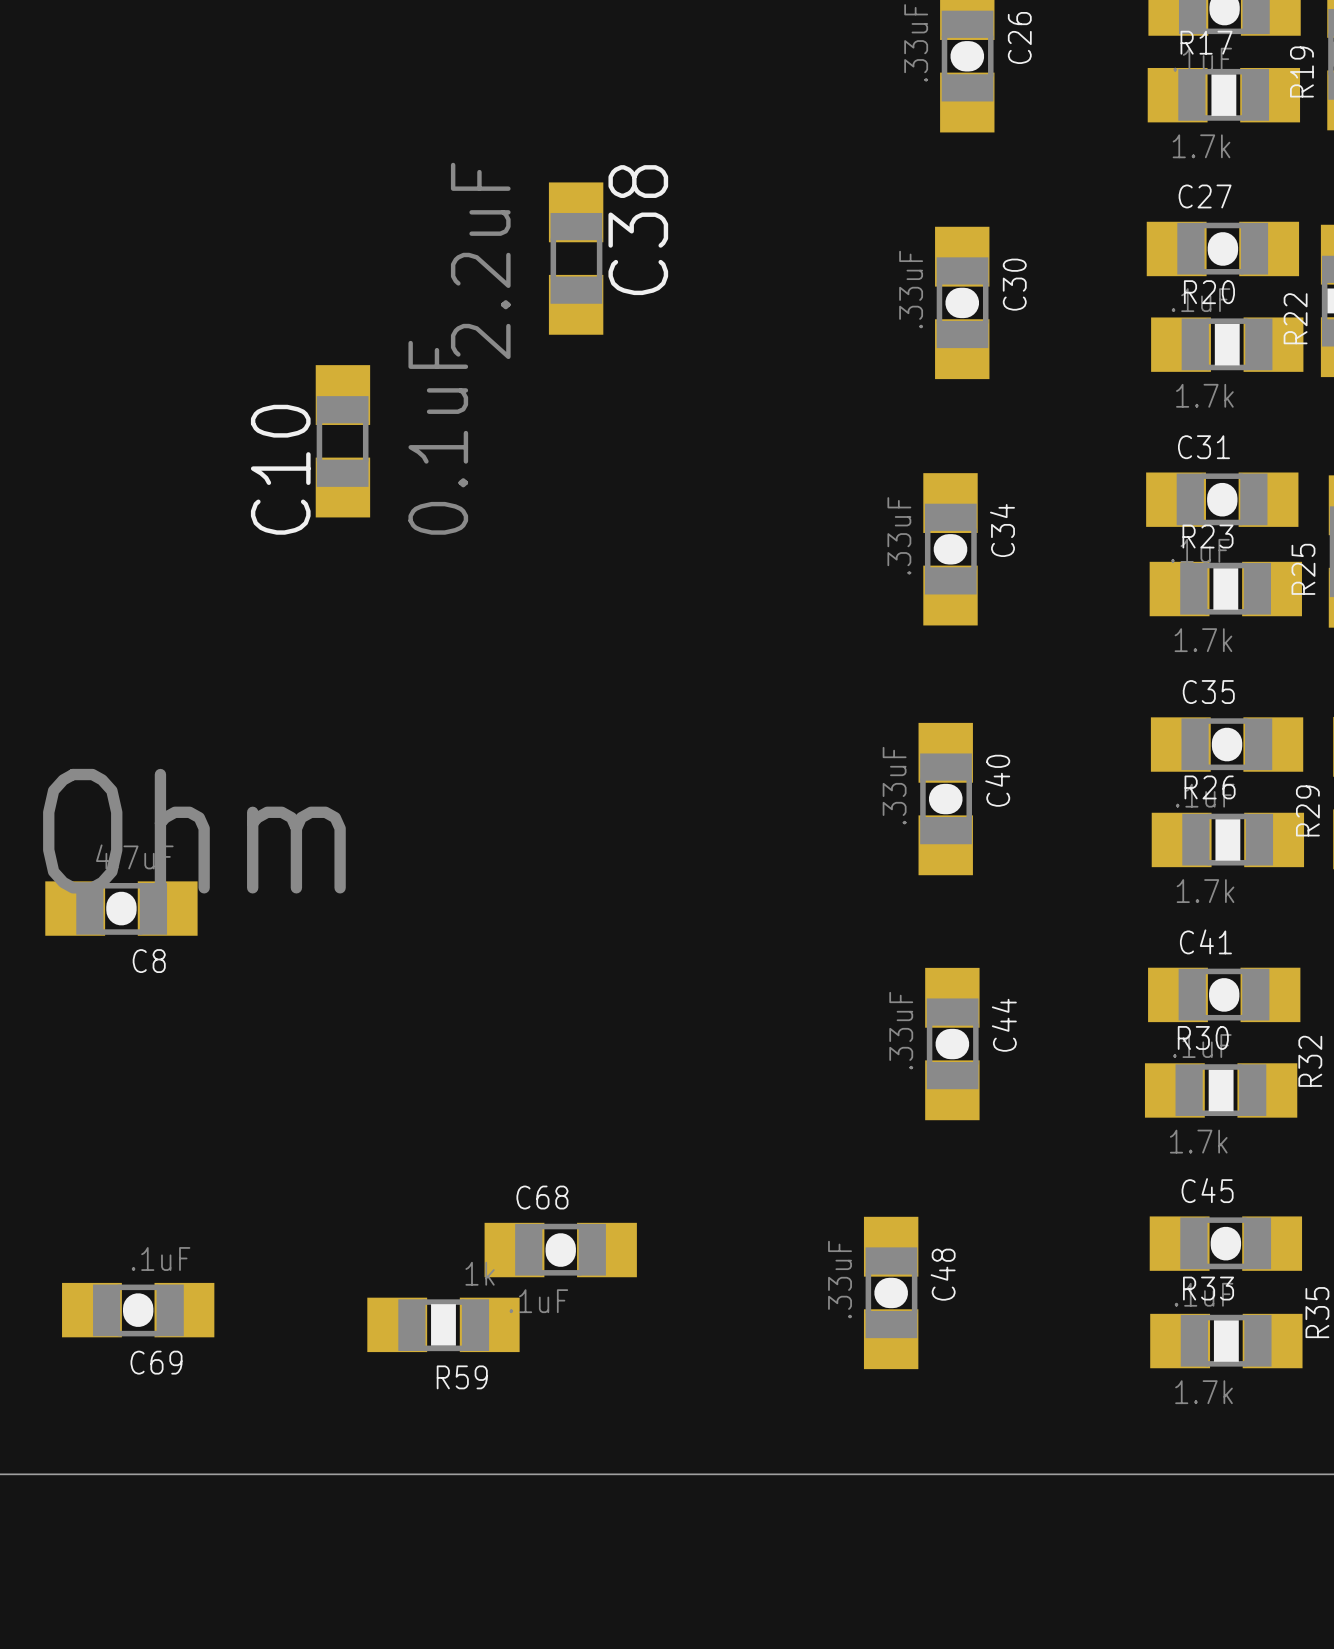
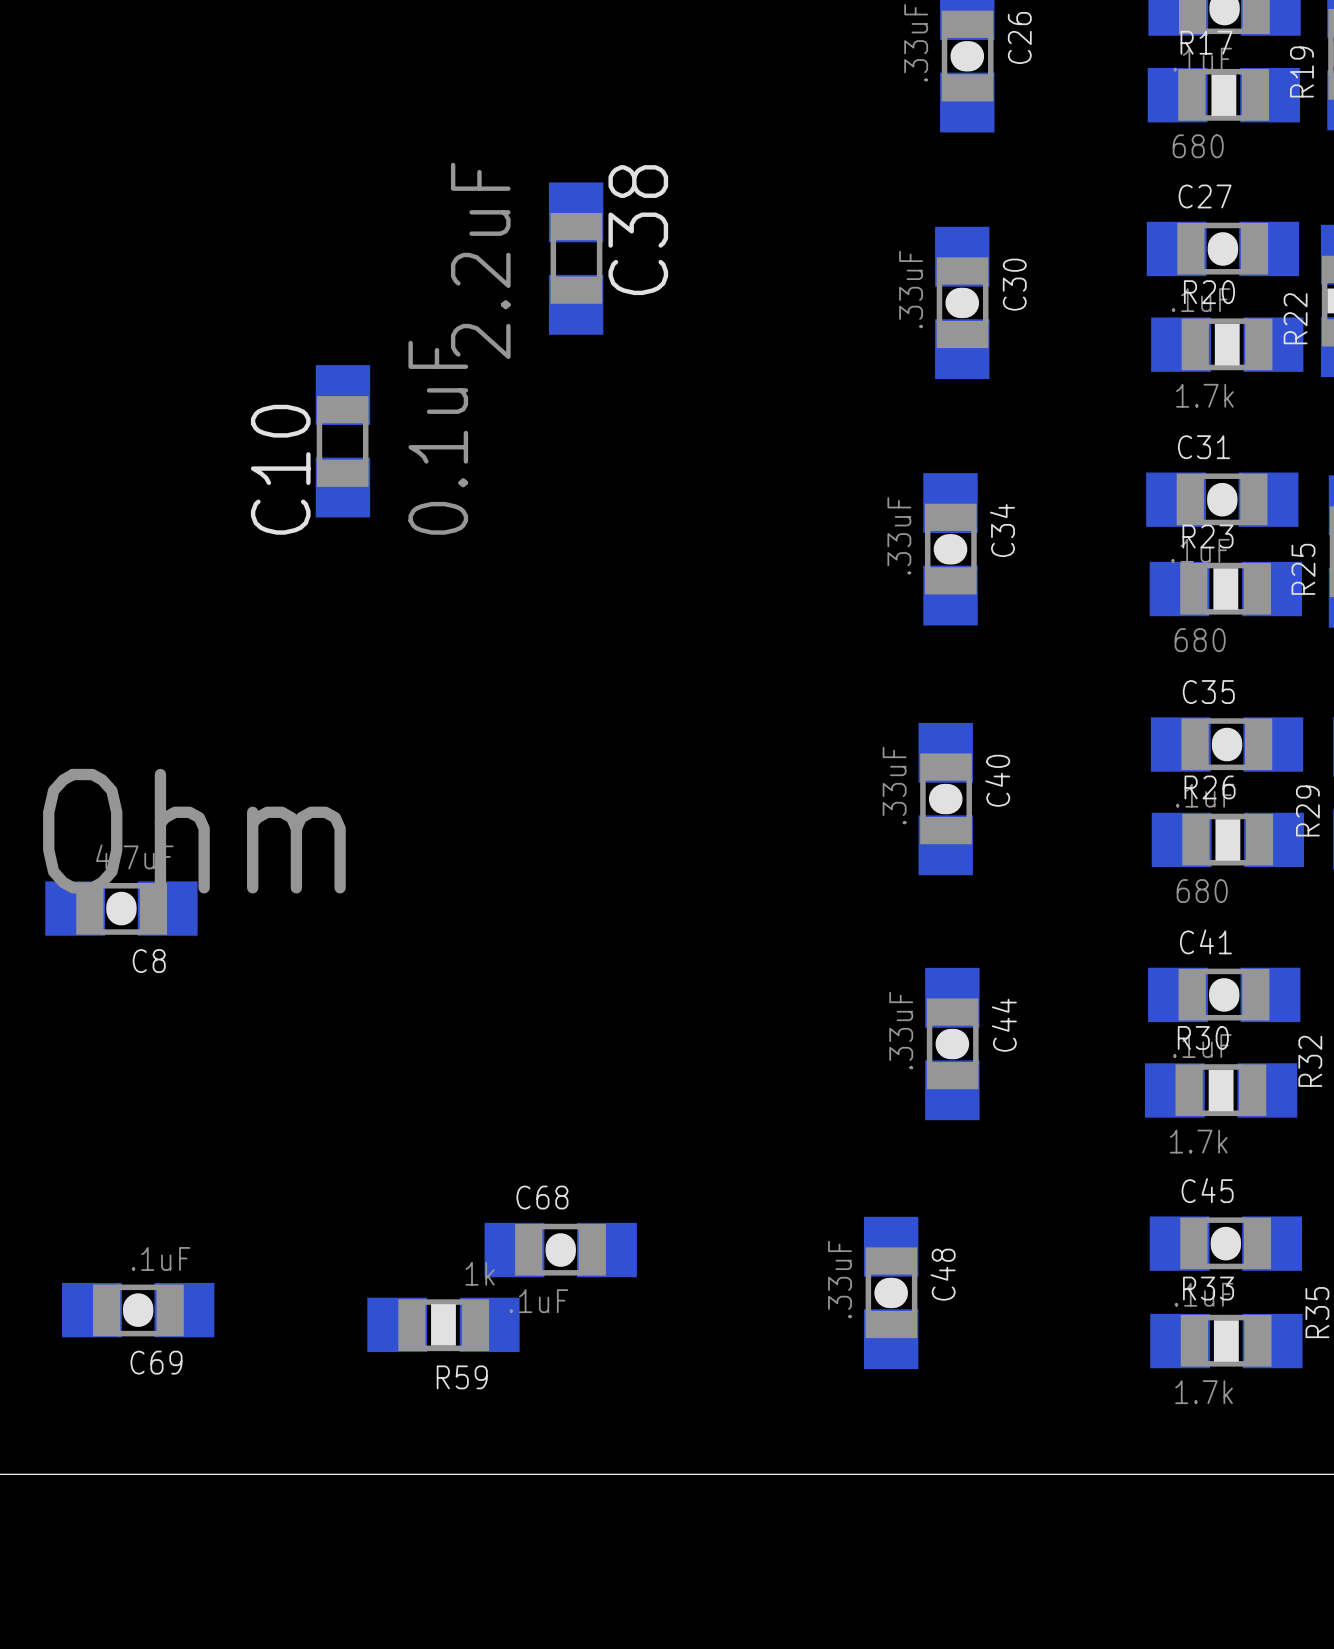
R17 value: 1.7k (1201, 146) -> 680 (1198, 146)
R23 value: 1.7k (1203, 640) -> 680 (1200, 640)
R26 value: 1.7k (1205, 891) -> 680 (1202, 891)

